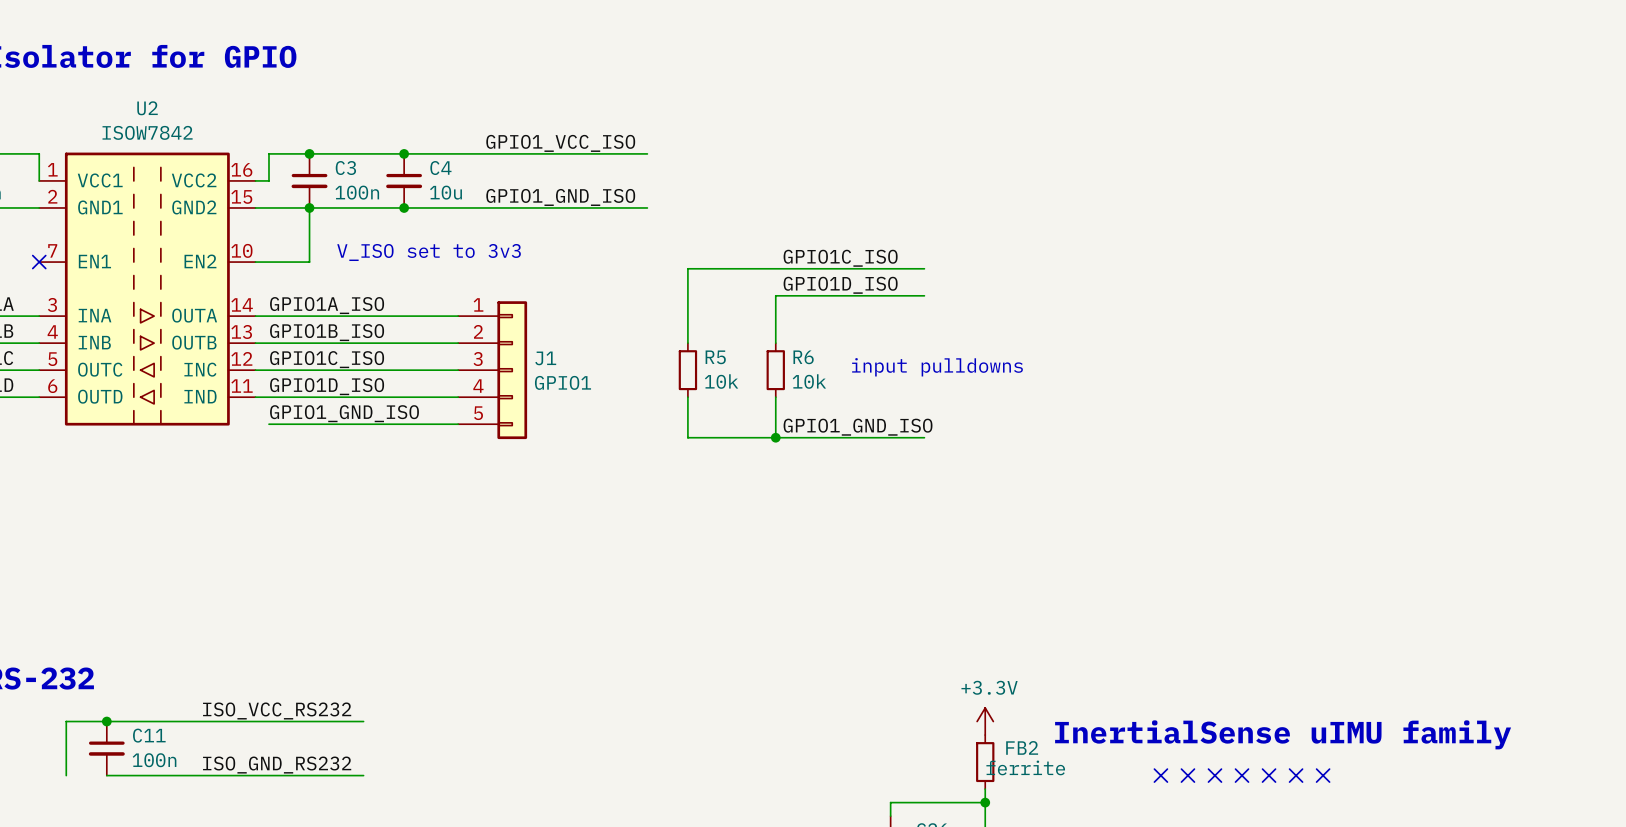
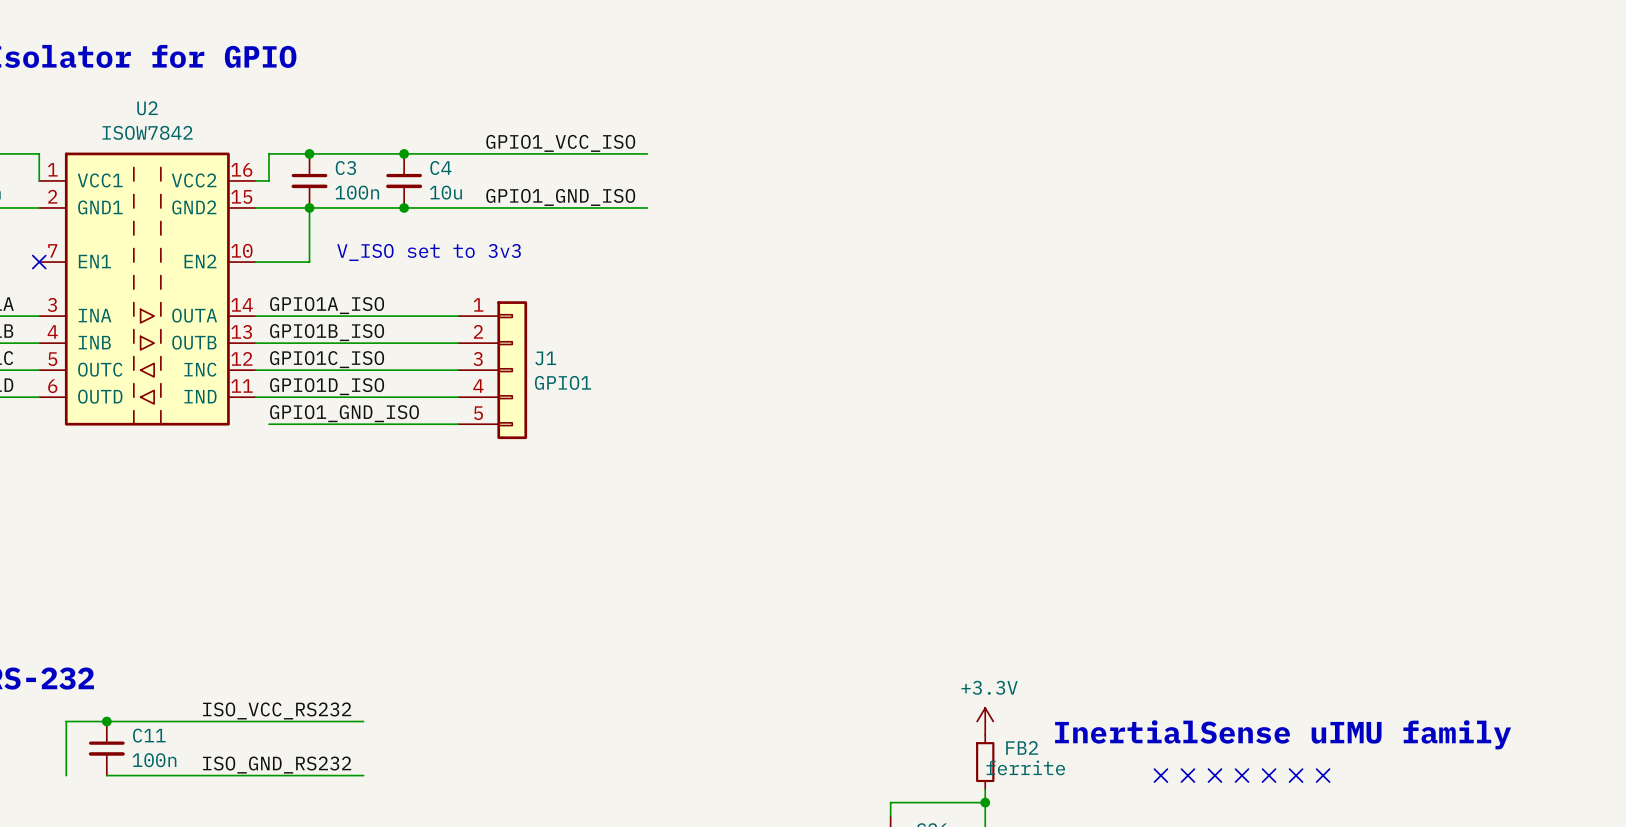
label: GPIO1C_ISO (840, 258) -> none
wire: (924, 268) (687, 268) (687, 343) -> none
label: GPIO1D_ISO (840, 285) -> none
wire: (924, 295) (775, 295) (775, 343) -> none
text: input pulldowns (937, 367) -> none
R5: 10k (687, 370) -> none
R6: 10k (775, 370) -> none
wire: (687, 397) (687, 437) (924, 437) -> none
wire: (775, 397) (775, 437) -> none
label: GPIO1_GND_ISO (858, 427) -> none
junction: (775, 437) -> none

